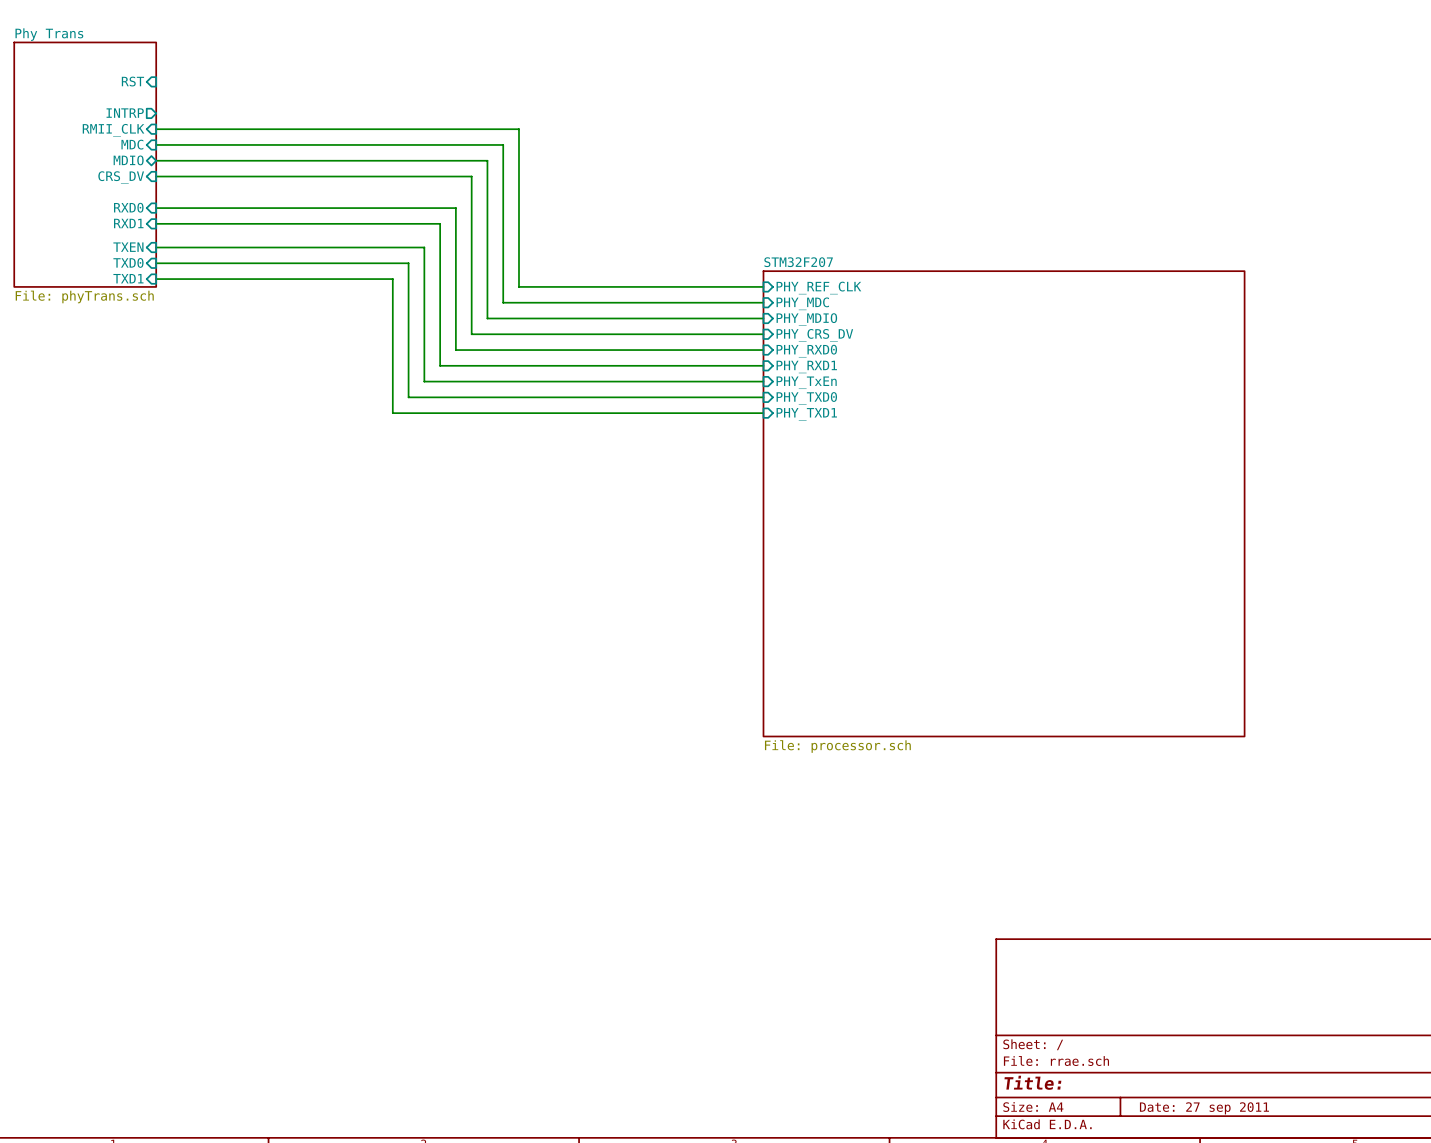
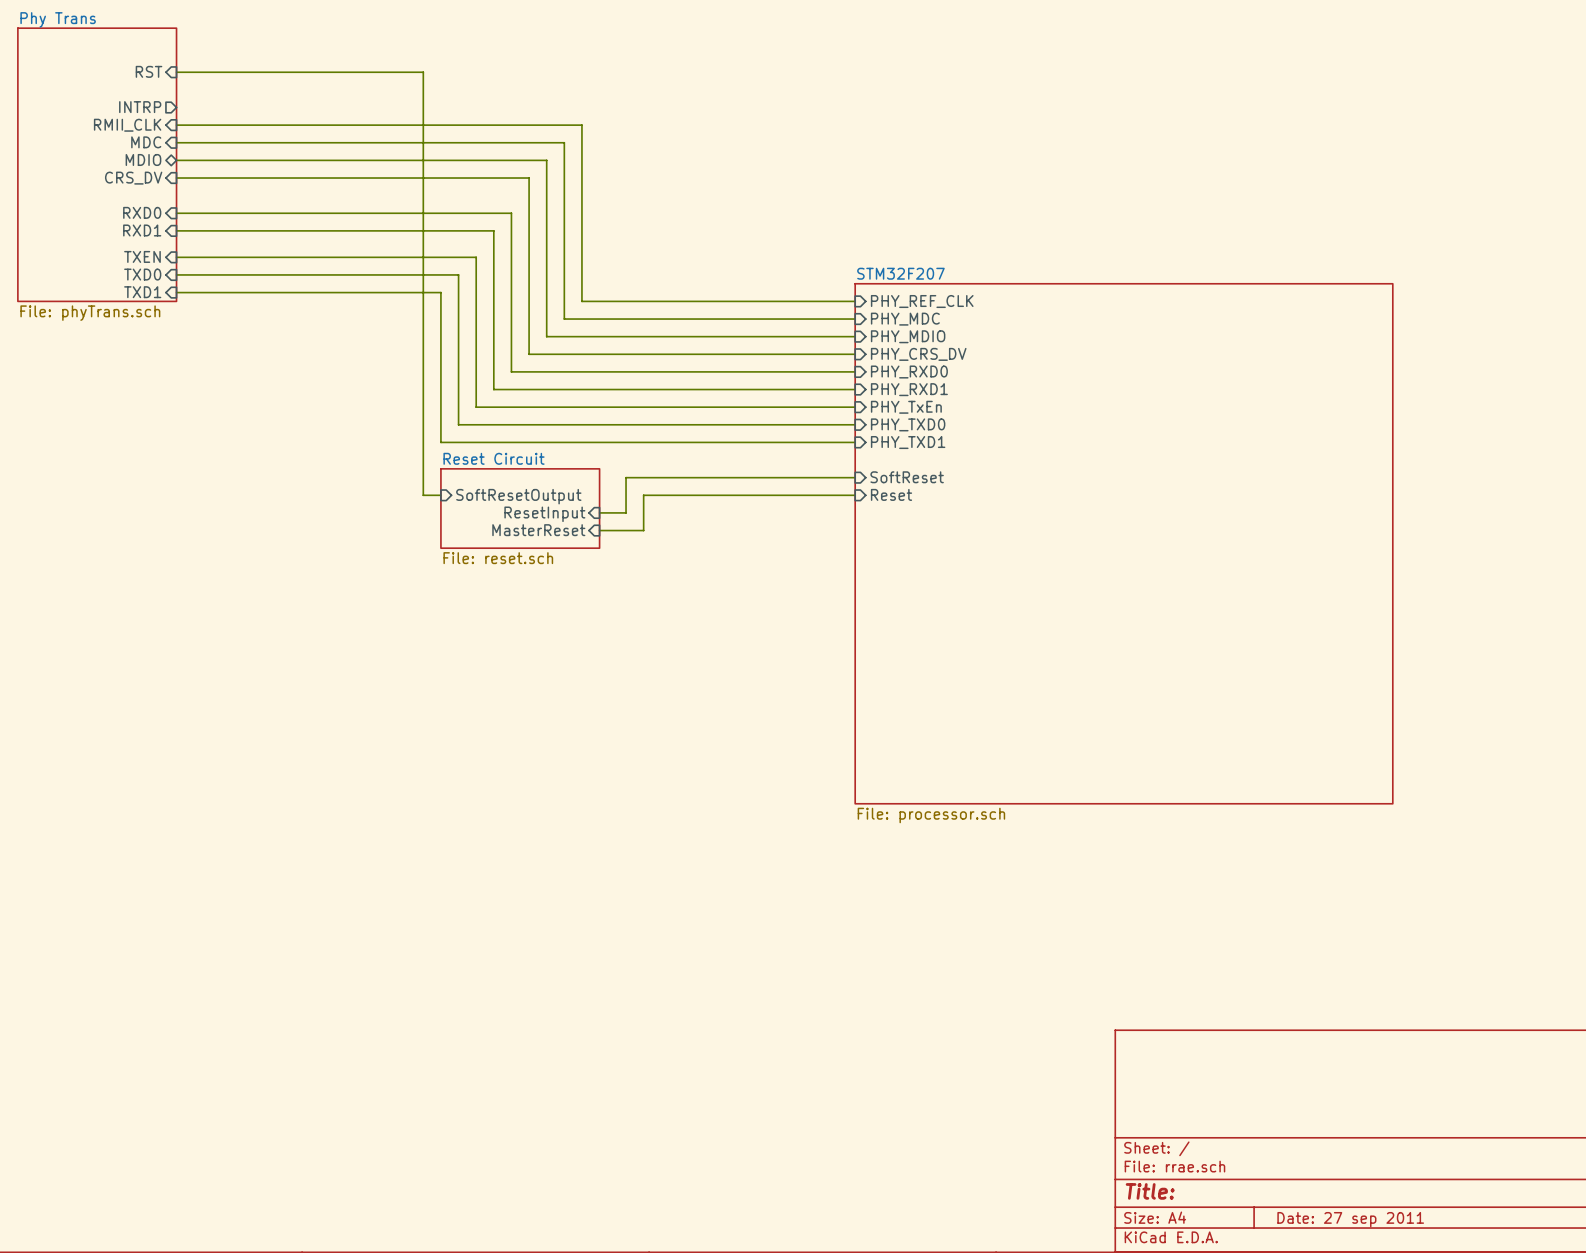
wire: none -> (176, 72) (423, 72) (423, 495) (440, 495)
wire: none -> (855, 477) (626, 477) (626, 512) (599, 512)
sheet pin: none -> SoftReset (907, 477)
wire: none -> (855, 495) (643, 495) (643, 530) (599, 530)
sheet pin: none -> Reset (891, 494)
sheet pin: none -> SoftResetOutput (518, 496)
sheet Reset Circuit: none -> File: reset.sch (520, 508)
sheet pin: none -> ResetInput (544, 514)
sheet pin: none -> MasterReset (538, 530)

